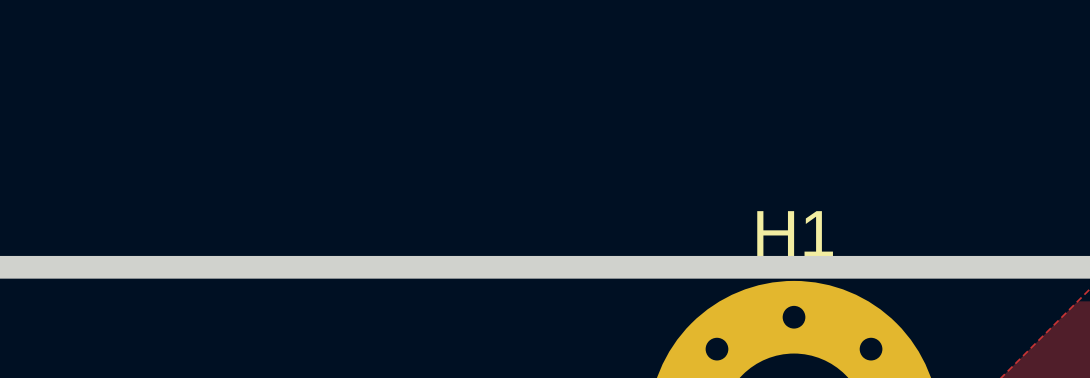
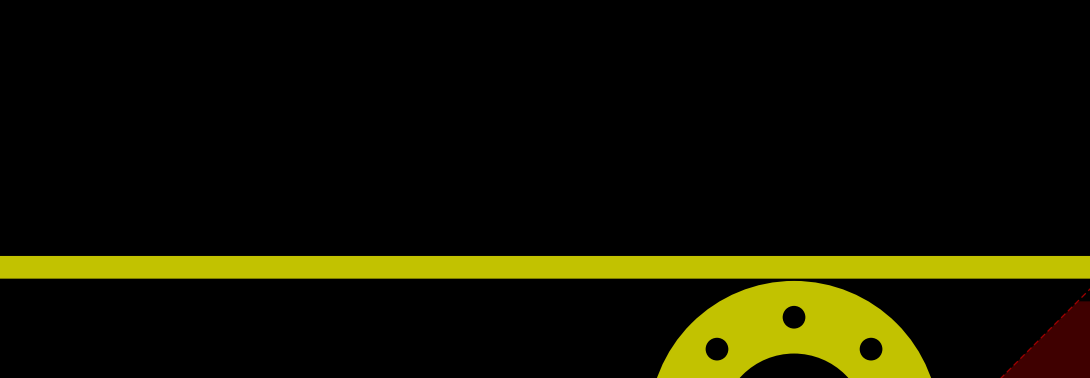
H1 name: H1 (795, 233) -> none

